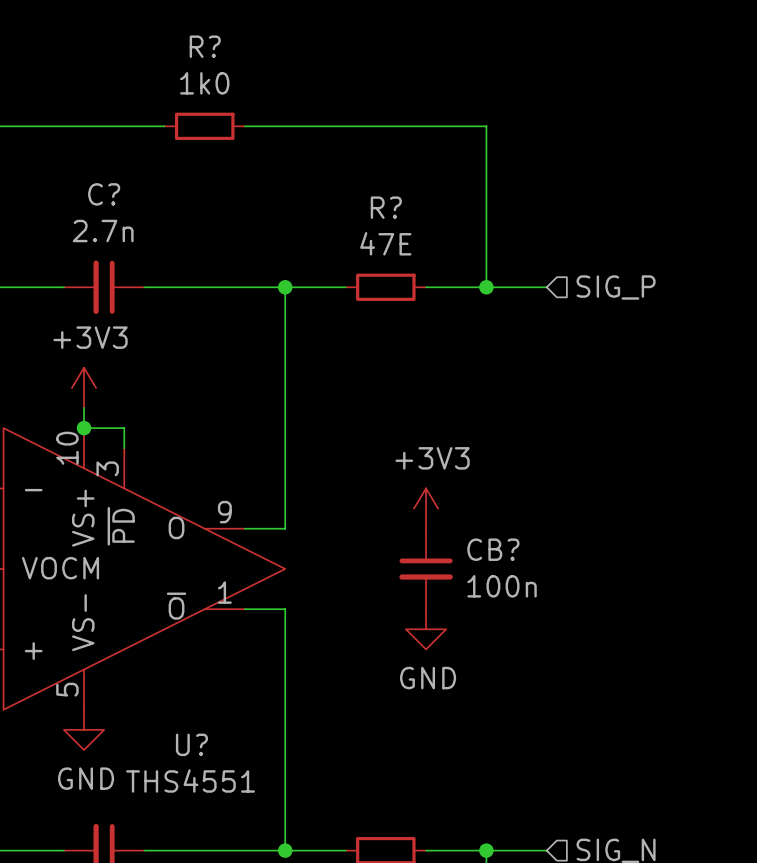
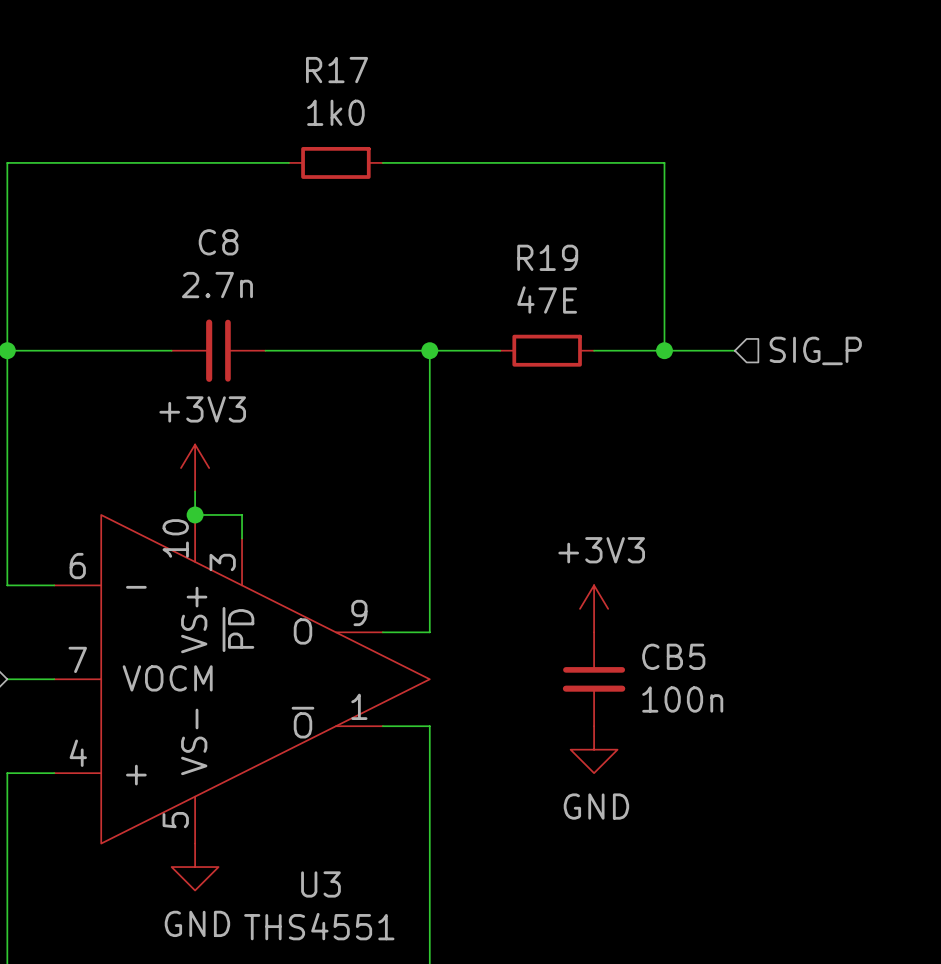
R? name: R? (205, 46) -> R17 (337, 70)
C? name: C? (104, 194) -> C8 (218, 242)
R? name: R? (386, 207) -> R19 (547, 257)
CB? name: CB? (493, 549) -> CB5 (673, 656)
U? name: U? (191, 744) -> U3 (320, 884)

